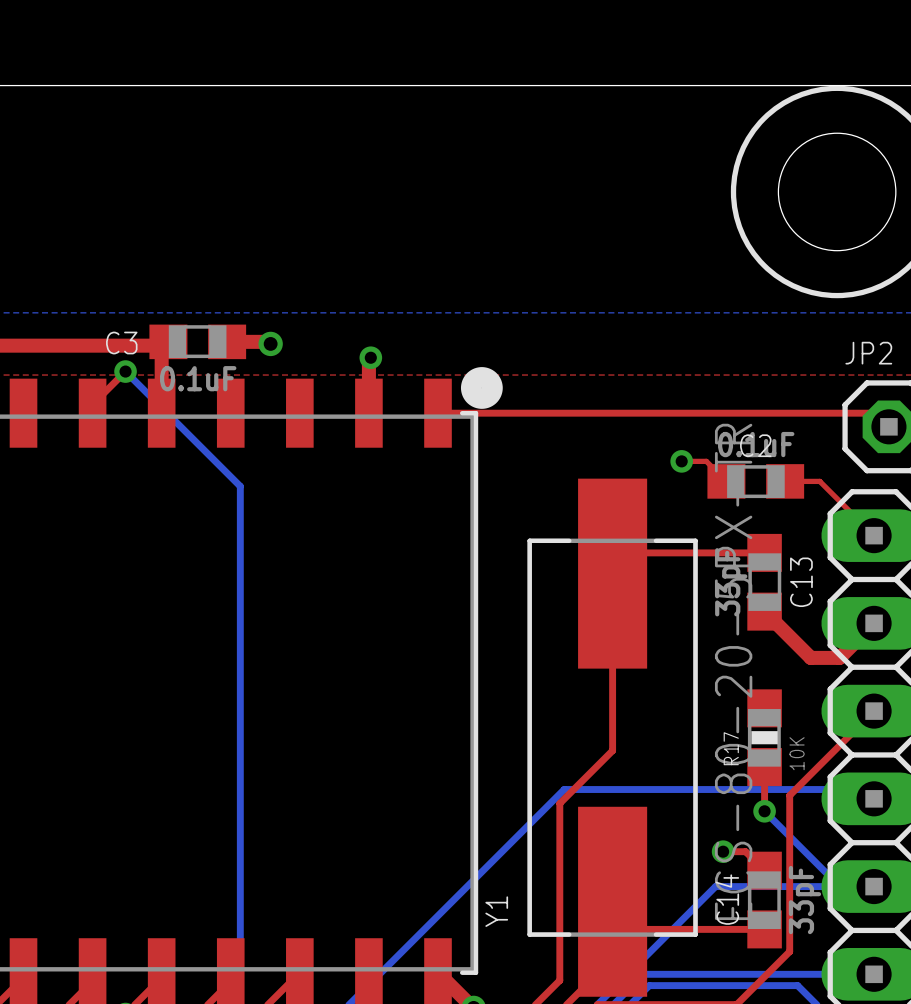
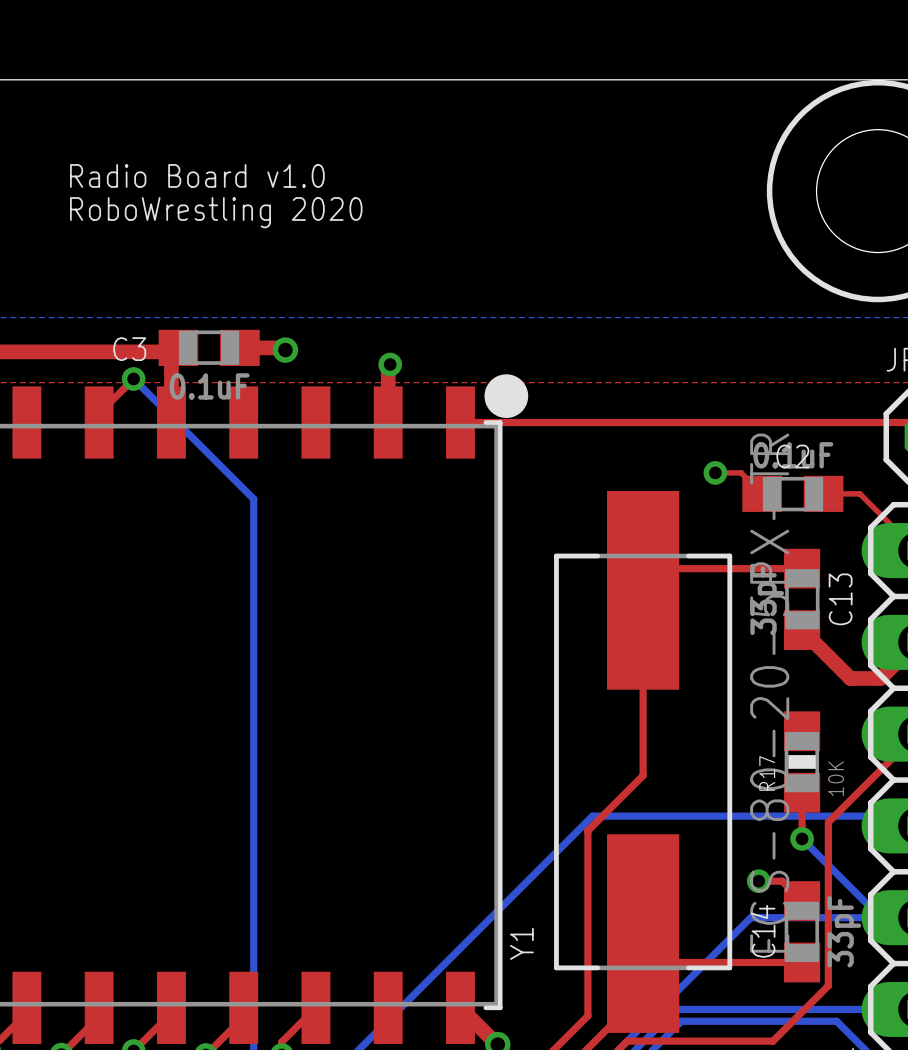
text: none -> Radio Board v1.0 (197, 175)
text: none -> RoboWrestling 2020 (216, 212)

